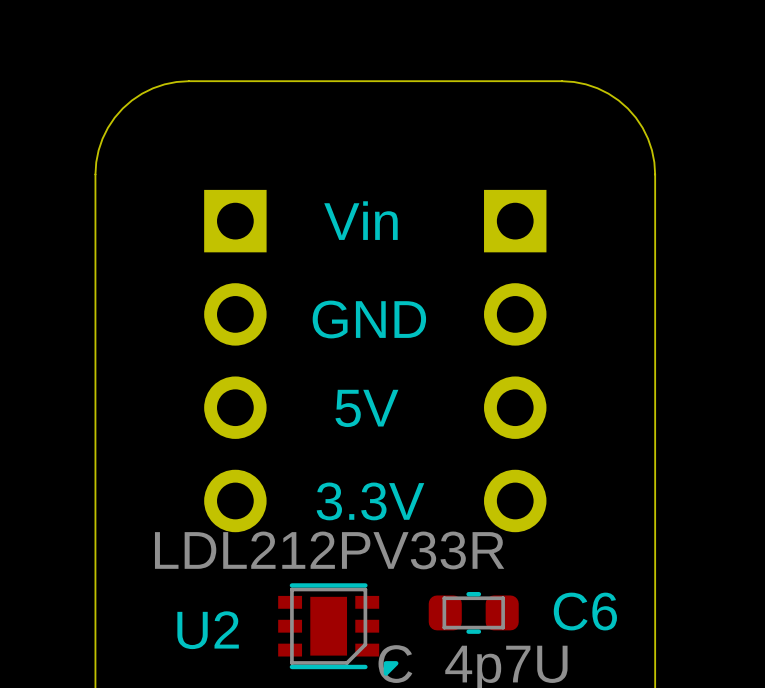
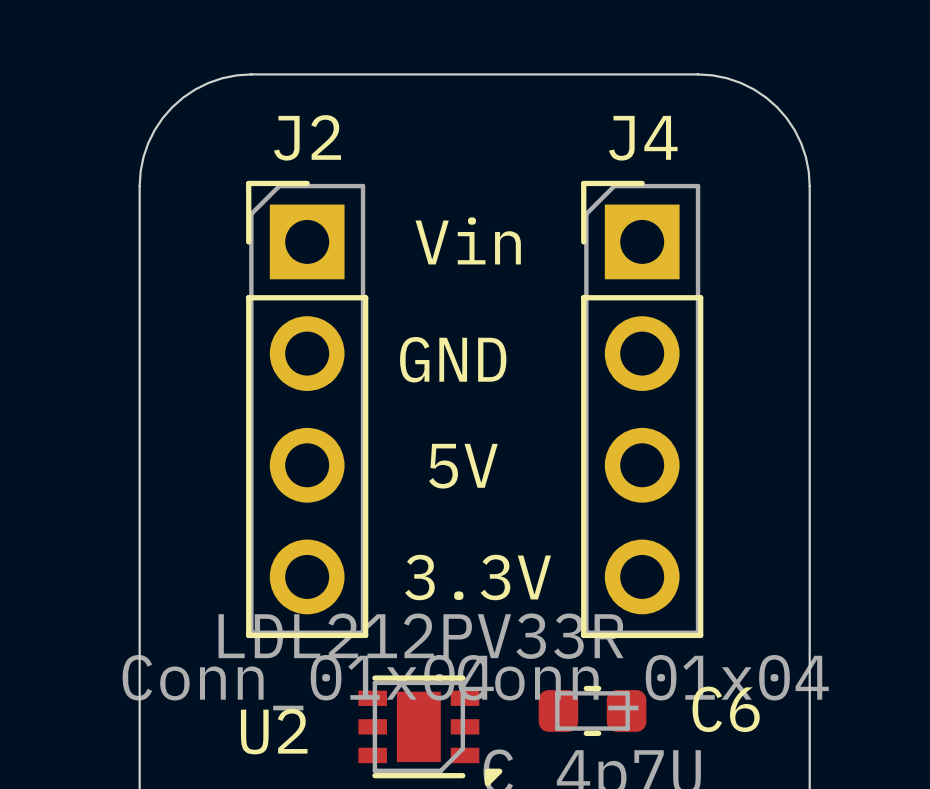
J2 side: bottom (235, 361) -> top (307, 409)
J4 side: bottom (515, 361) -> top (642, 409)

